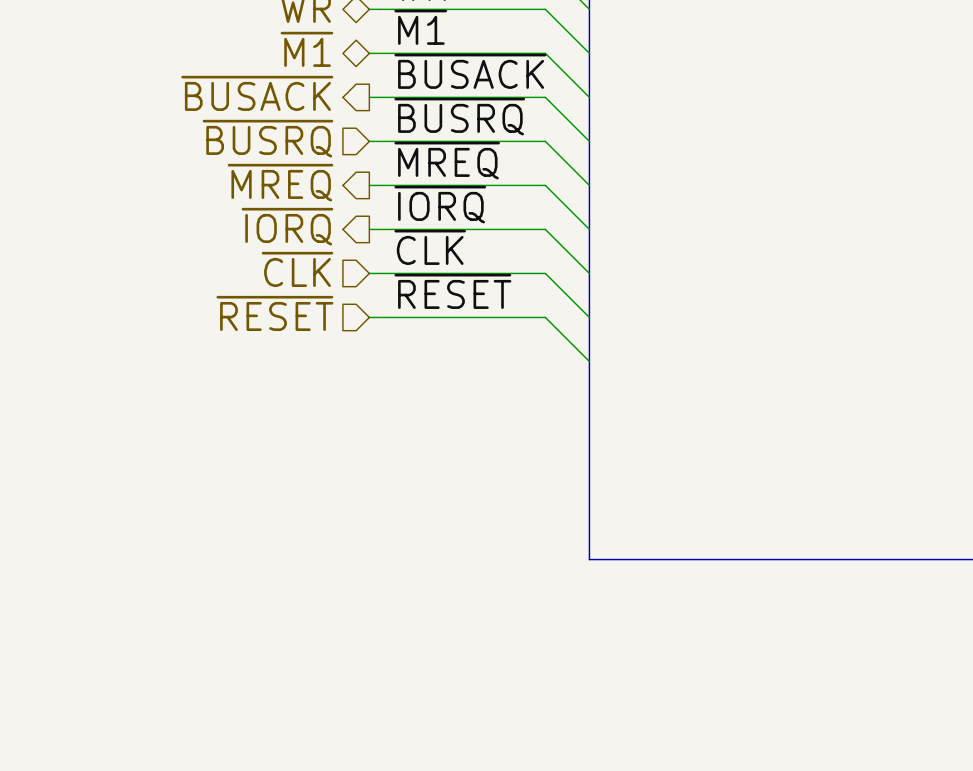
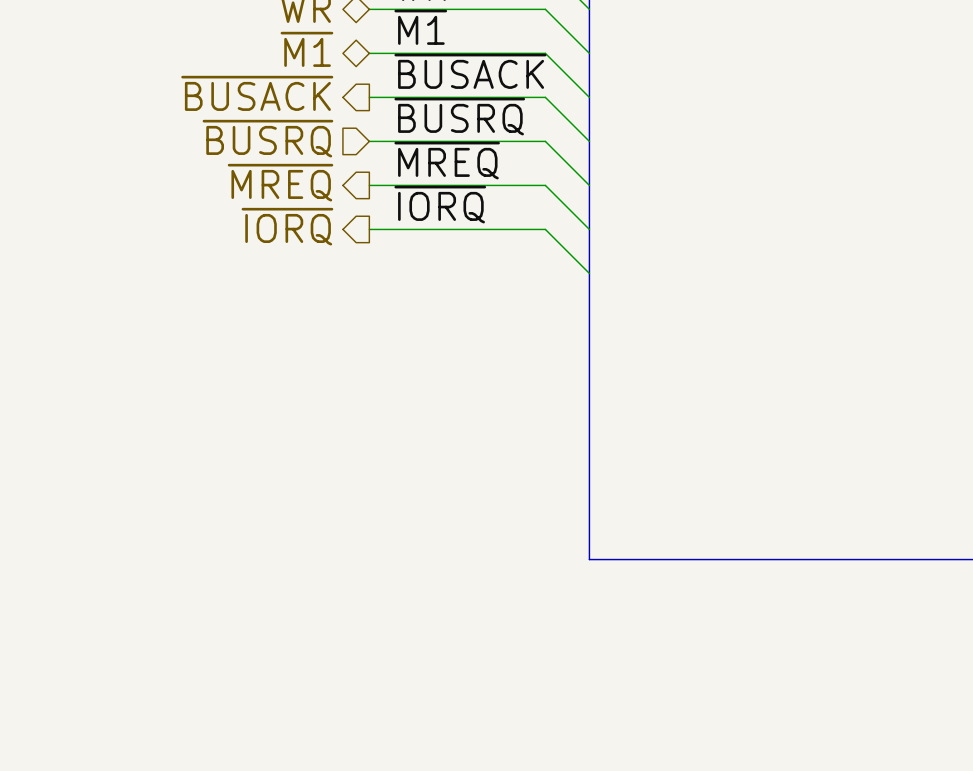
label: ~{CLK} (430, 247) -> none
hierarchical label: ~{CLK} (297, 269) -> none
wire: (369, 273) (545, 273) (589, 317) -> none
label: ~{RESET} (452, 291) -> none
hierarchical label: ~{RESET} (274, 313) -> none
wire: (369, 317) (545, 317) (589, 361) -> none

